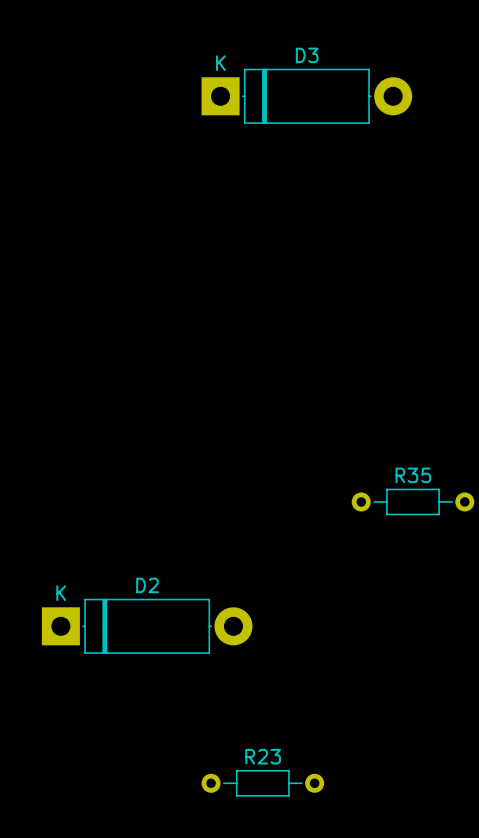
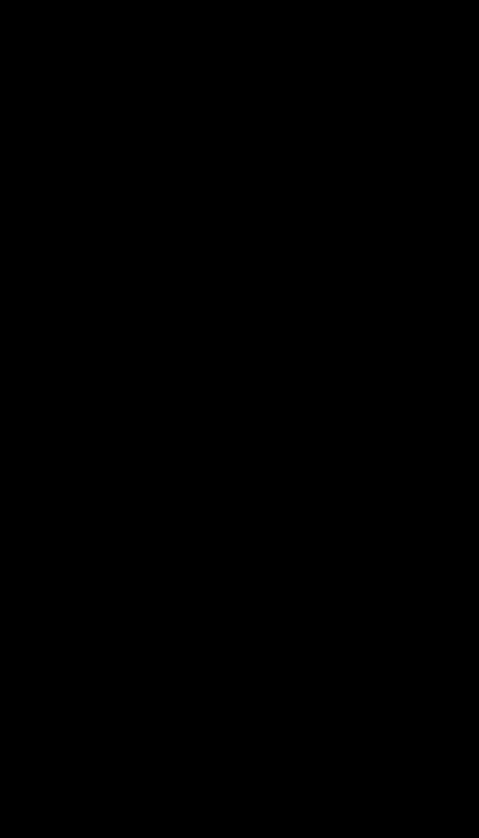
D3: (306, 96) -> none
R35: (413, 501) -> none
D2: (147, 626) -> none
R23: (262, 783) -> none

